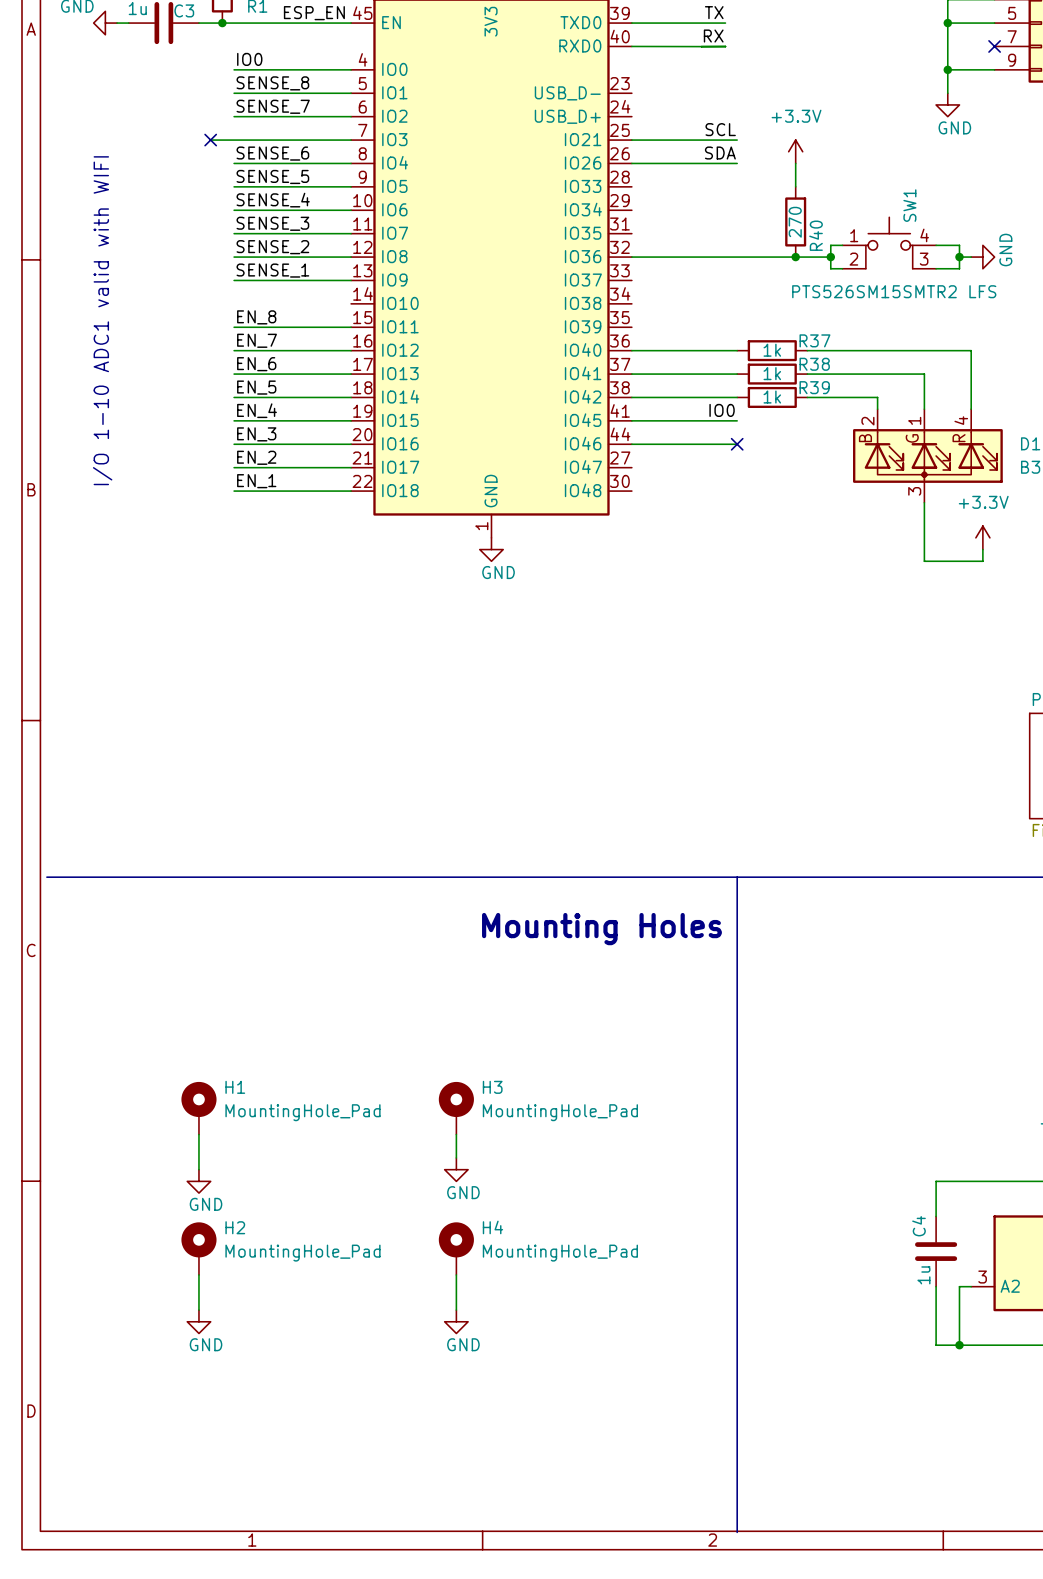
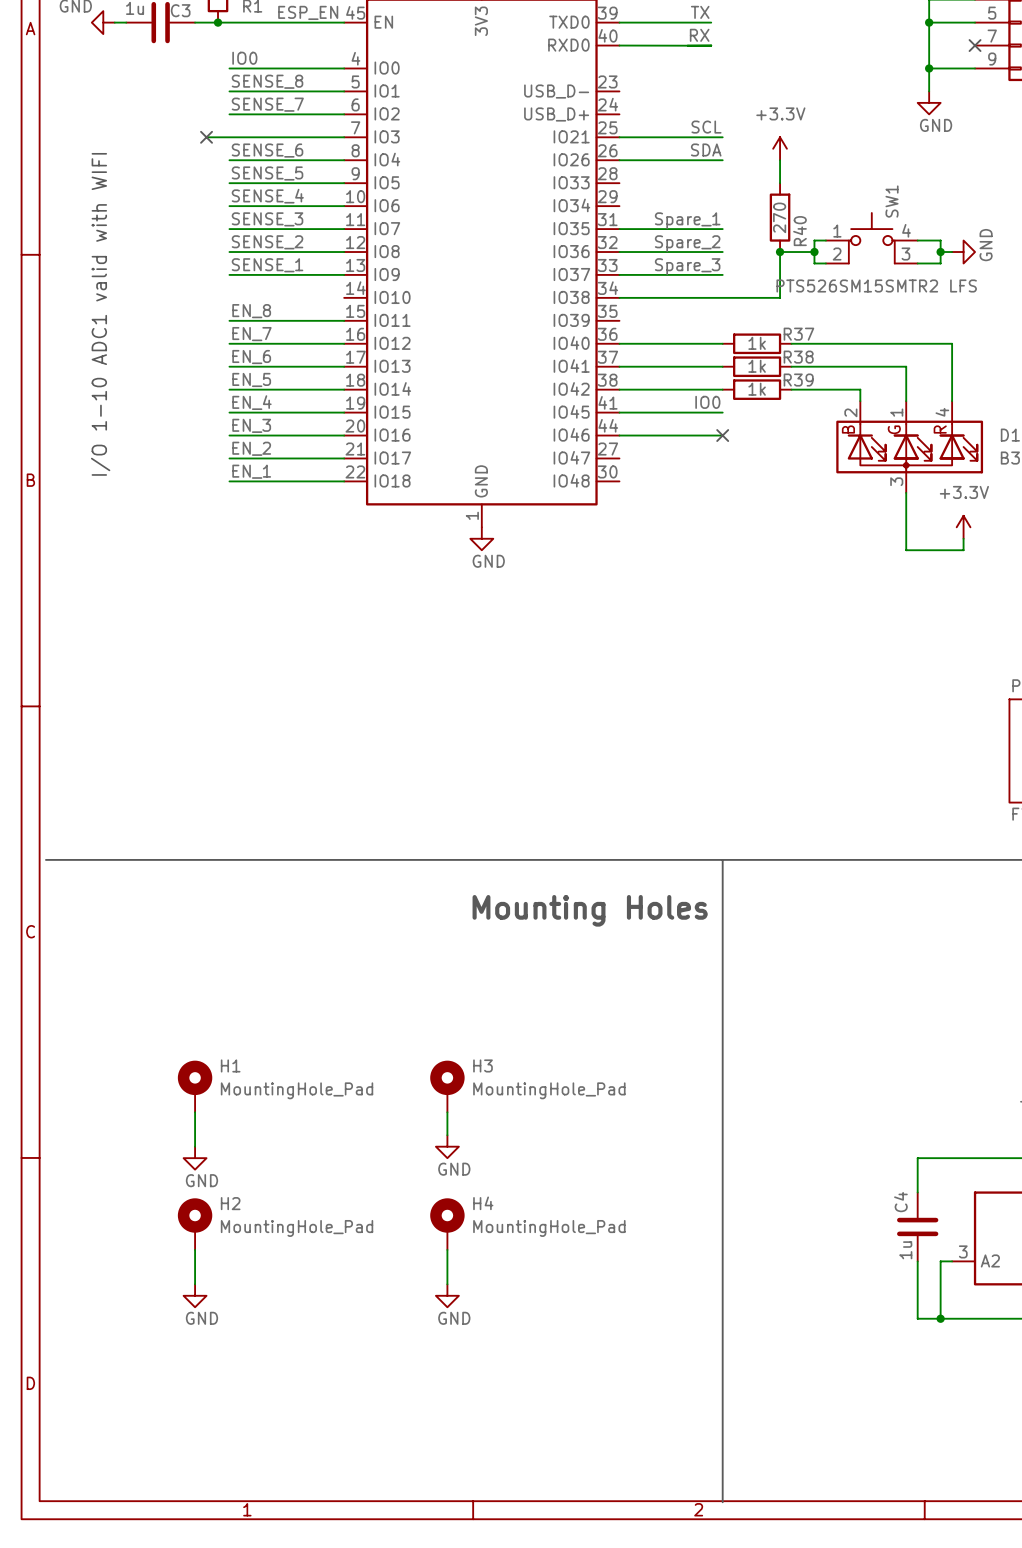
label: none -> Spare_1 (687, 220)
wire: none -> (619, 229) (722, 229)
label: none -> Spare_2 (687, 243)
wire: (737, 257) (795, 257) -> (619, 297) (780, 297) (780, 252)
label: none -> Spare_3 (687, 266)
wire: none -> (619, 274) (722, 274)

